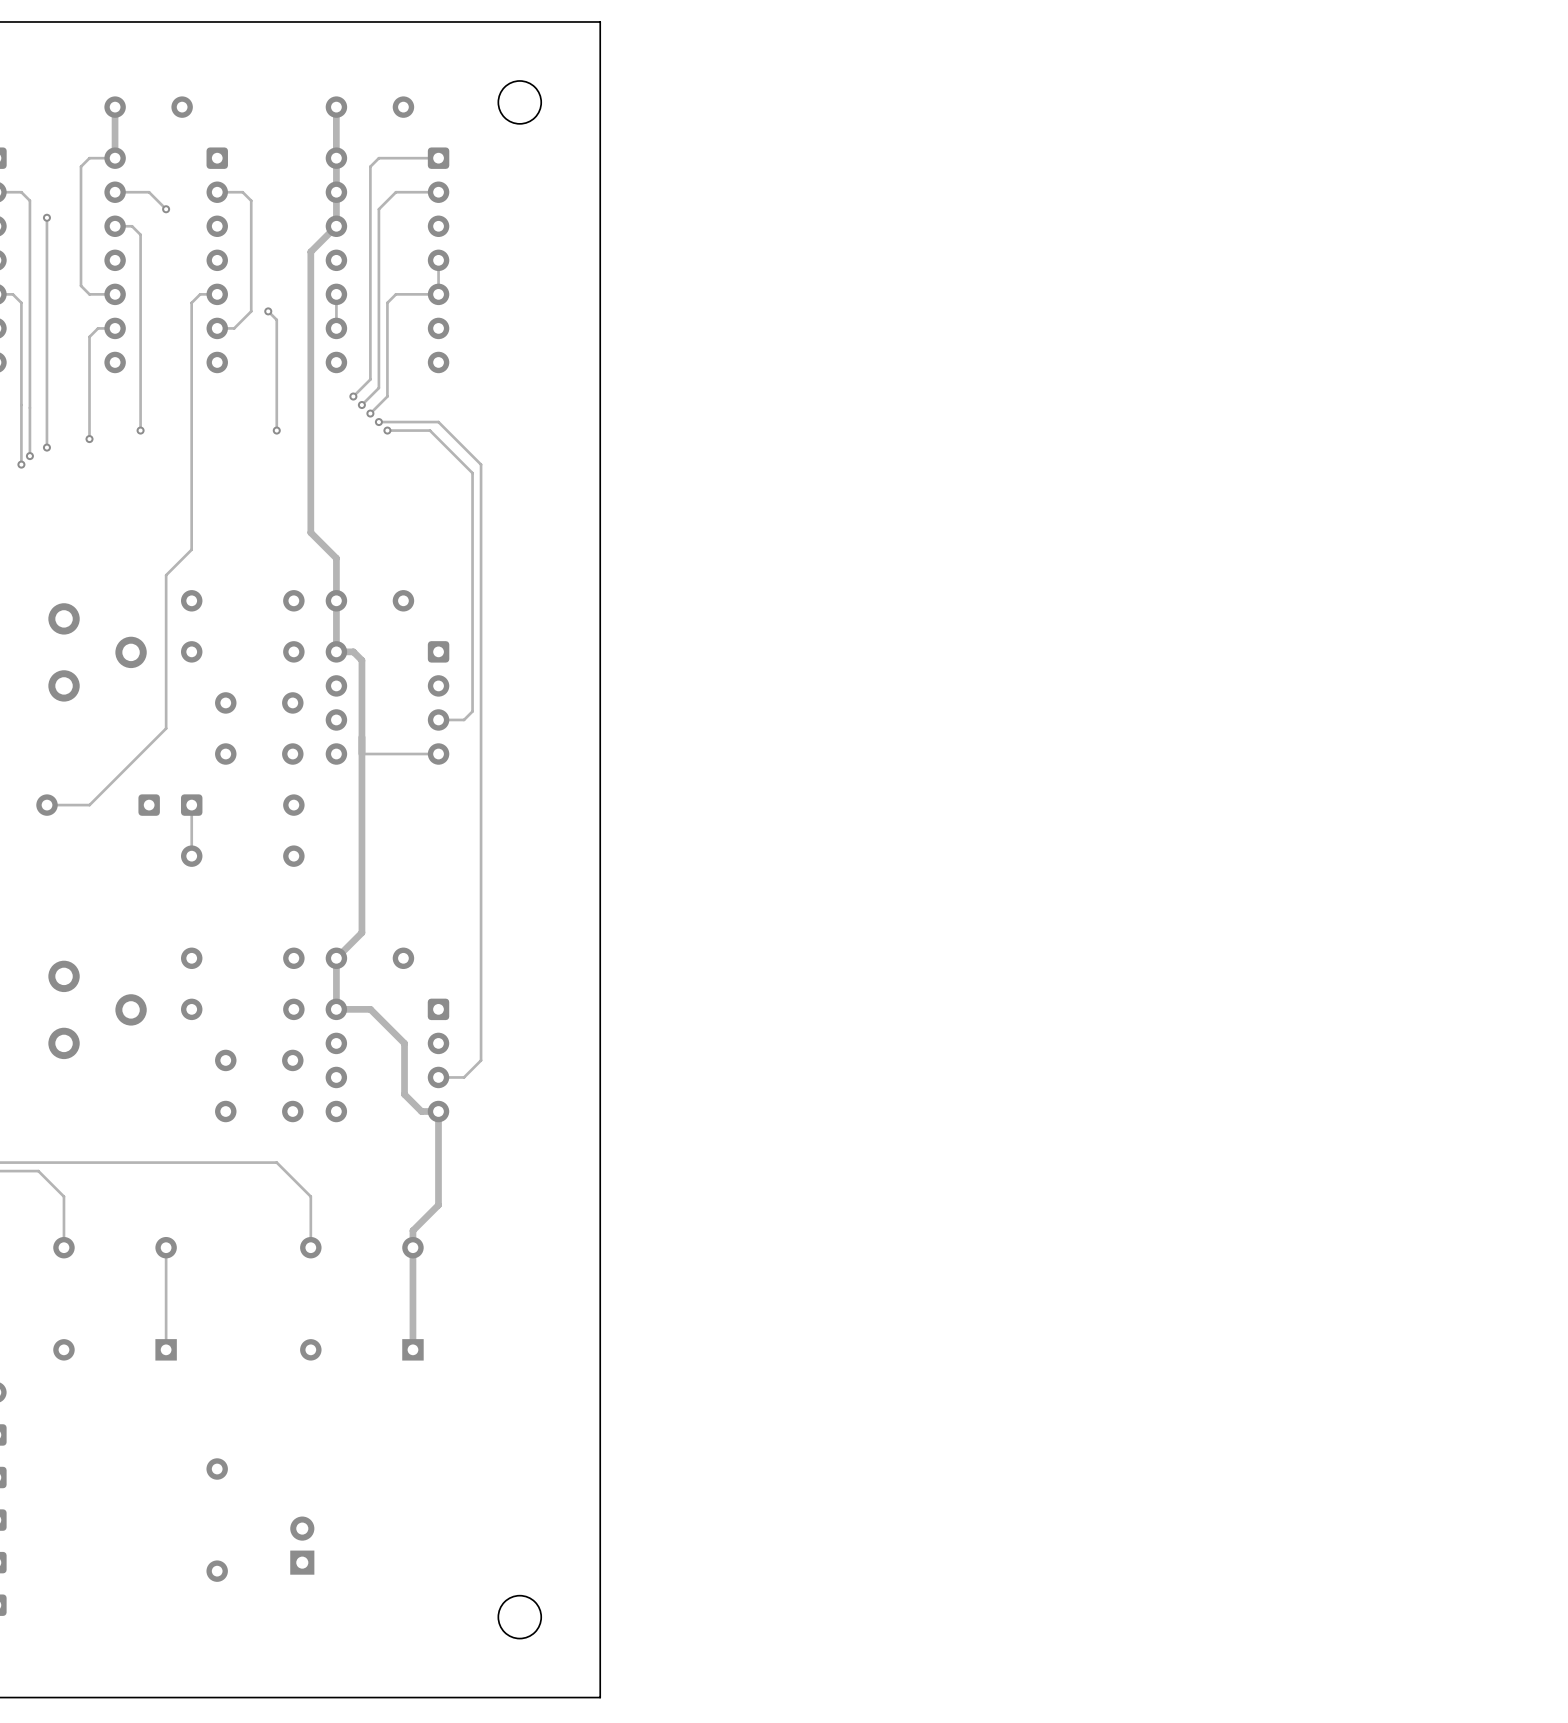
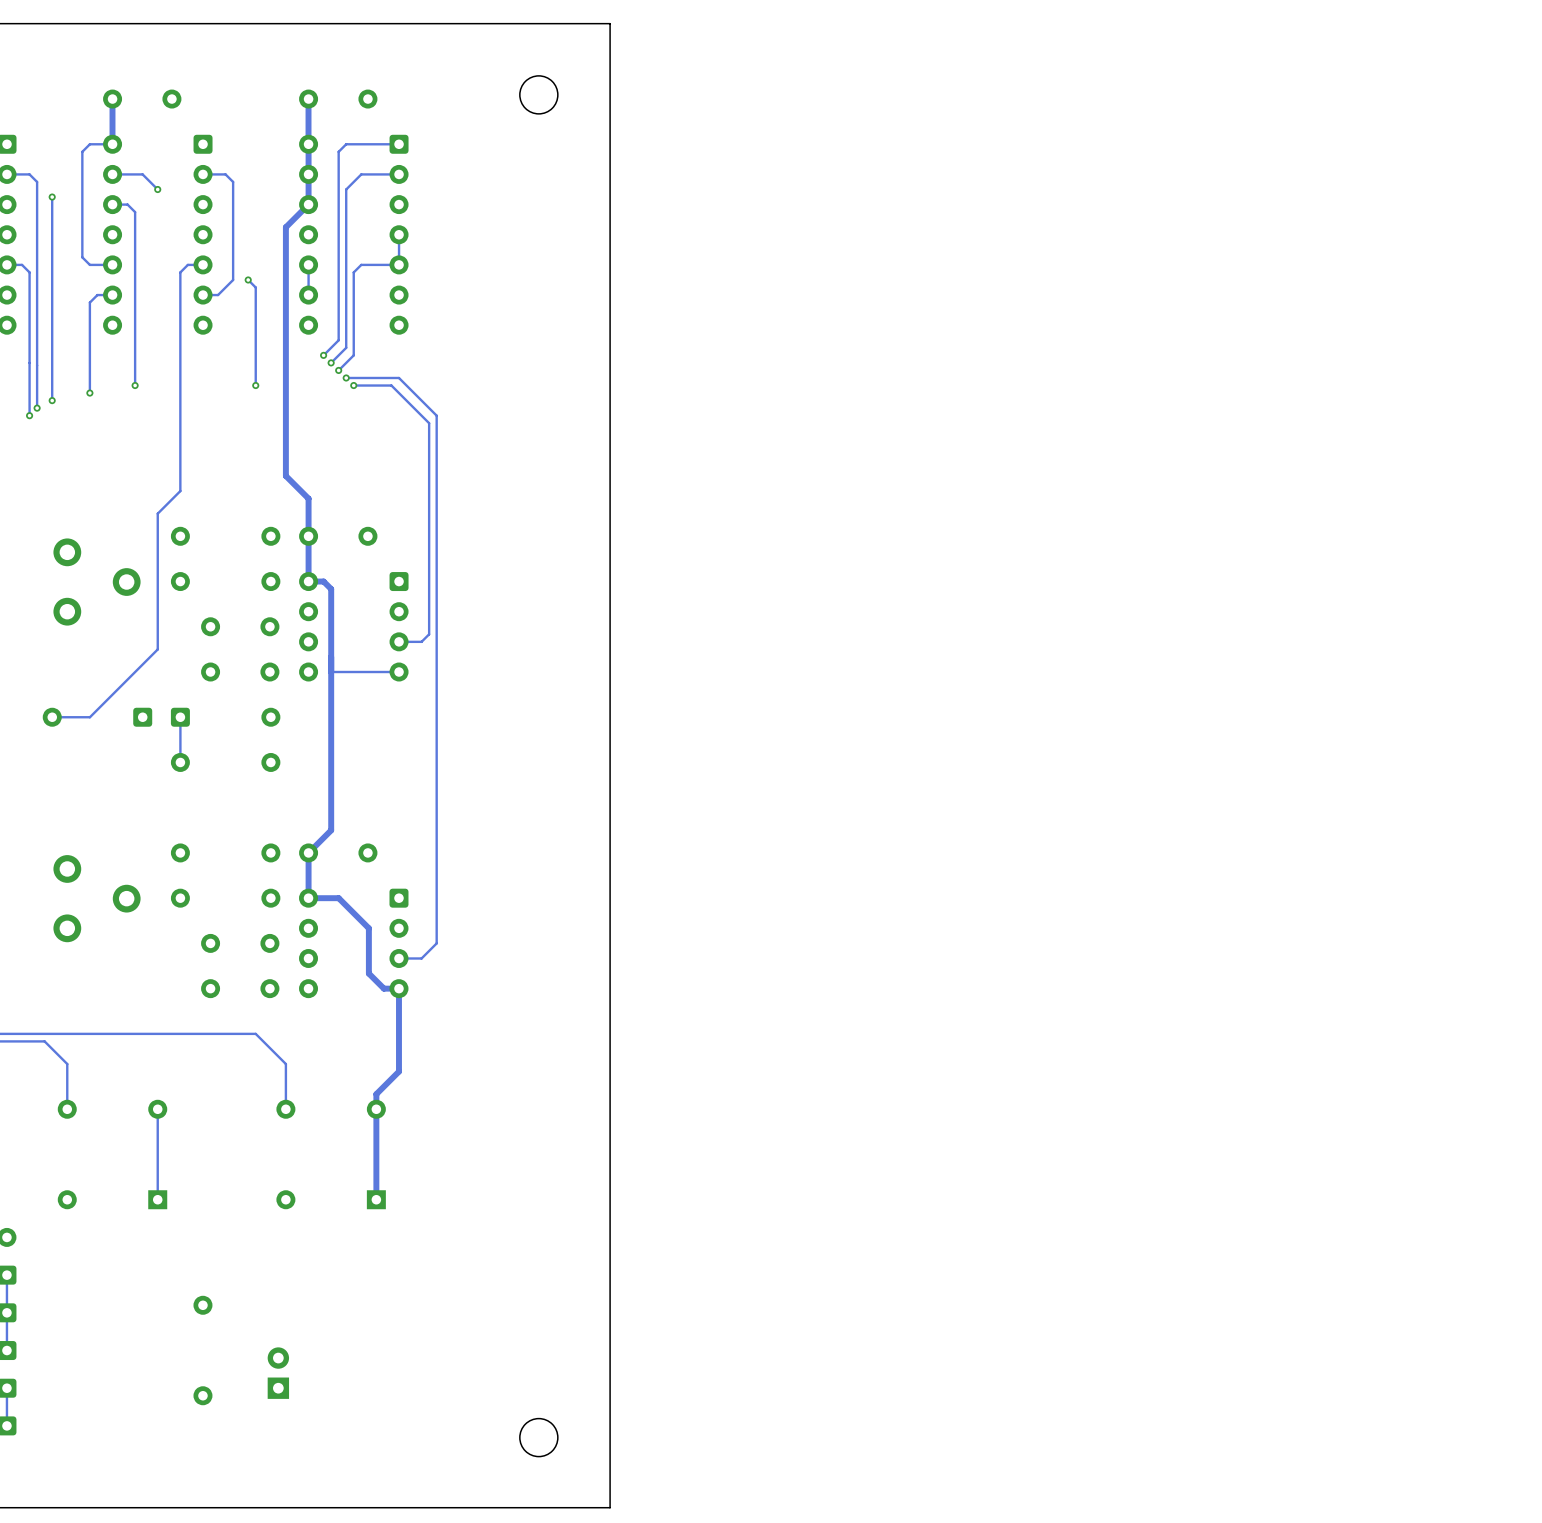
board edge: (600, 21) (600, 1697) -> (542, 23) (610, 23) (610, 1507) (542, 1507)
round board edge position: (519, 102) -> (538, 94)
round board edge position: (519, 1617) -> (538, 1437)

